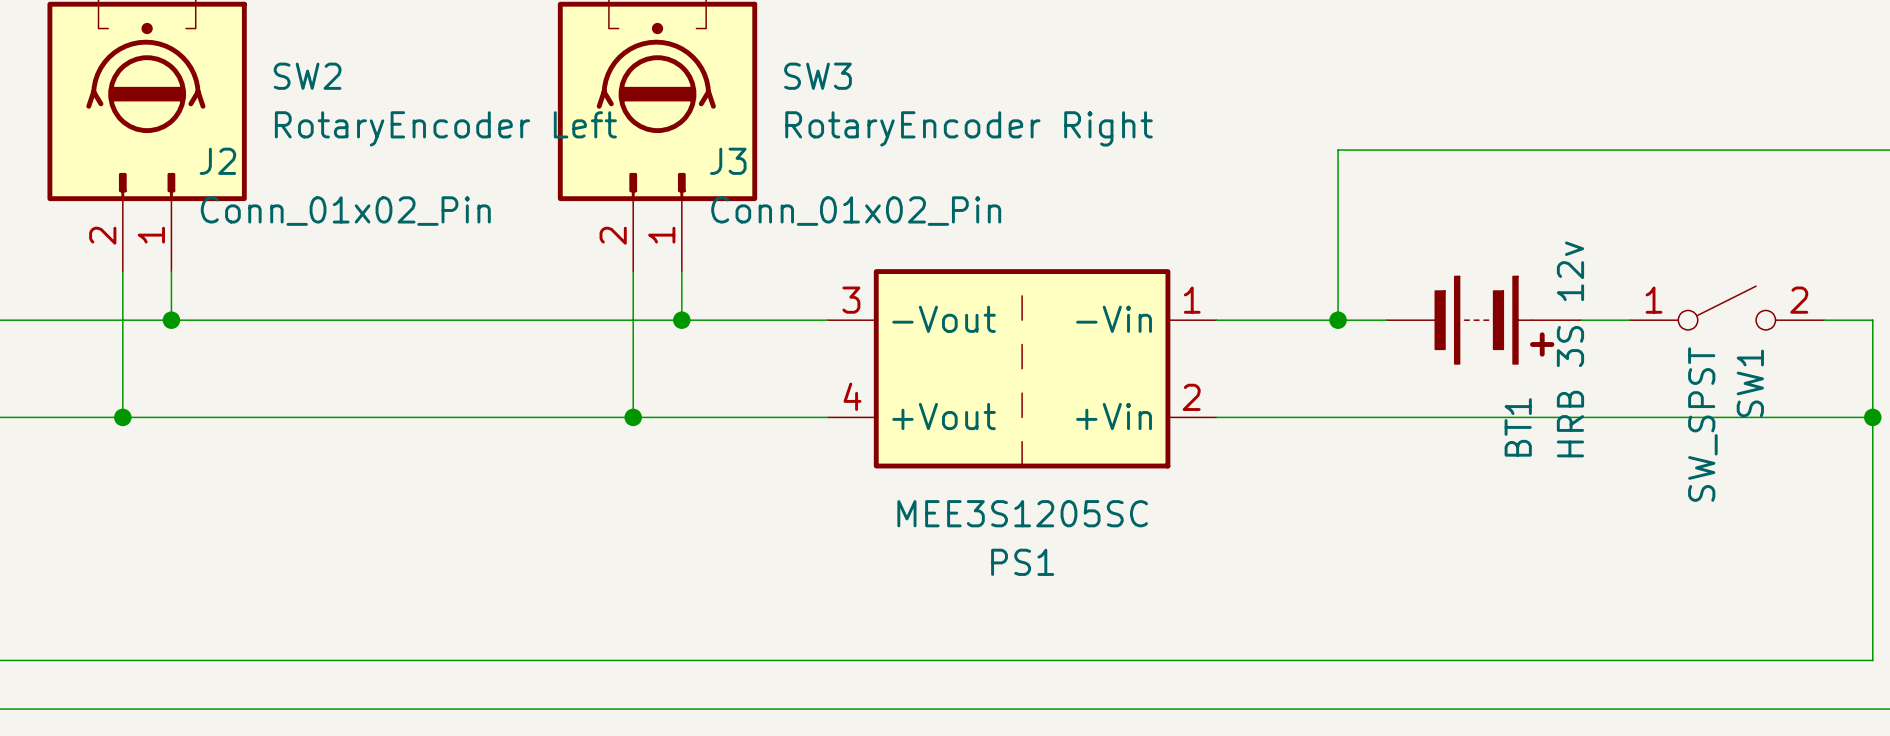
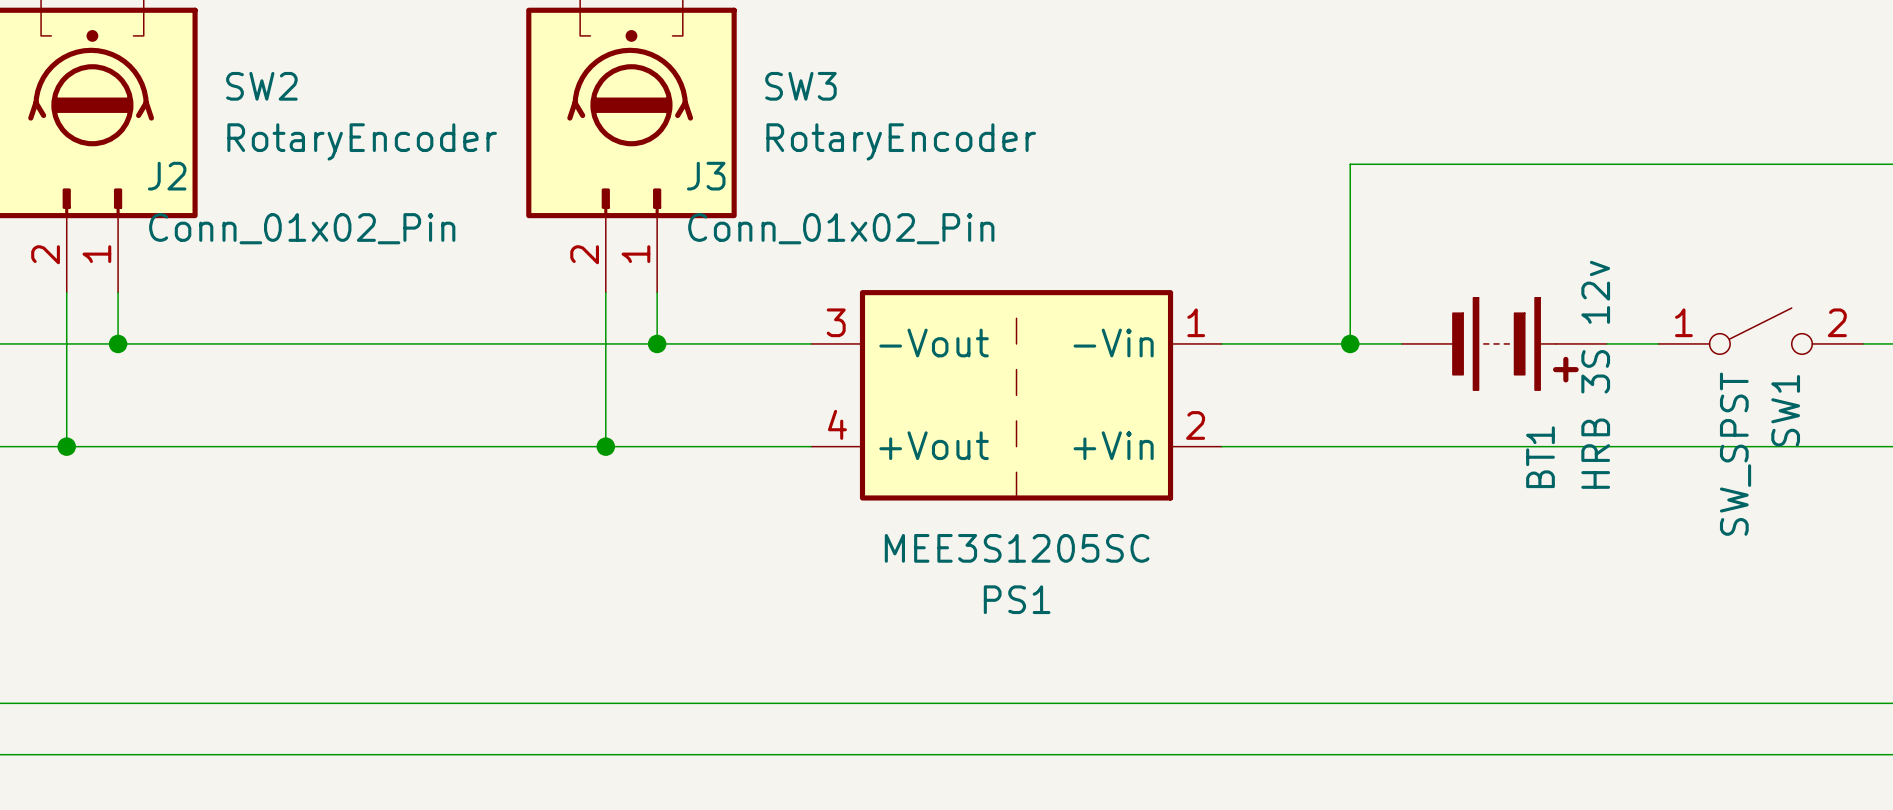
SW2 value: RotaryEncoder Left (445, 128) -> RotaryEncoder (362, 141)
SW3 value: RotaryEncoder Right (969, 128) -> RotaryEncoder (901, 141)

